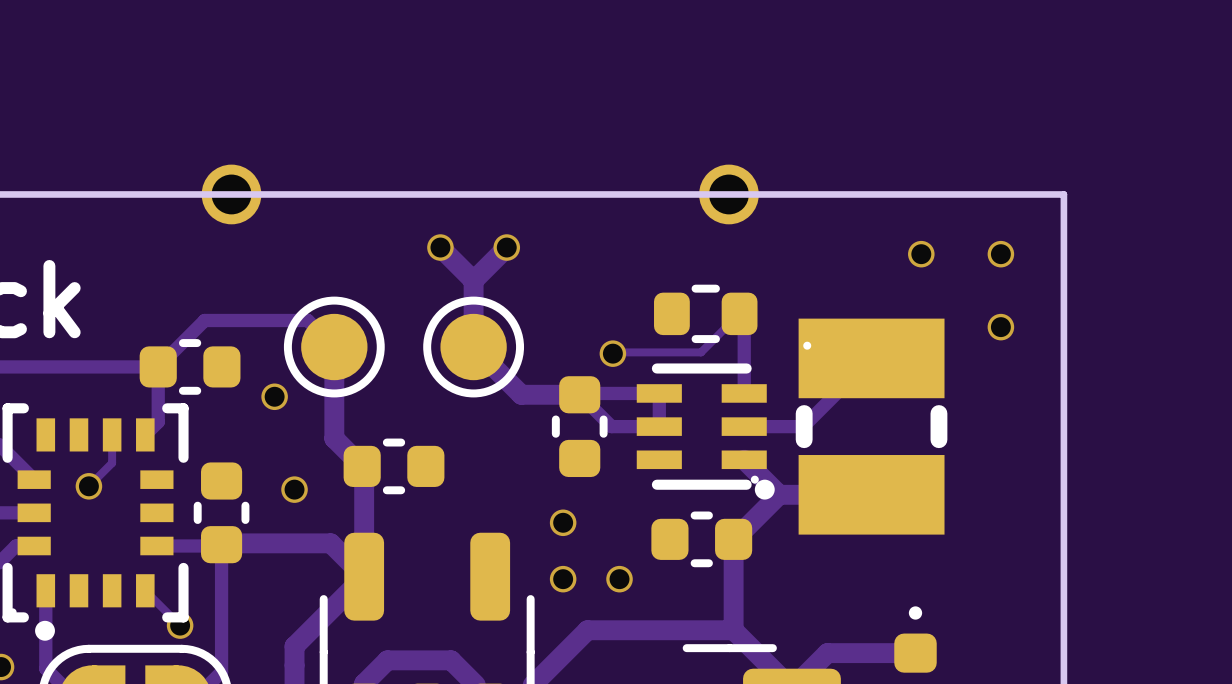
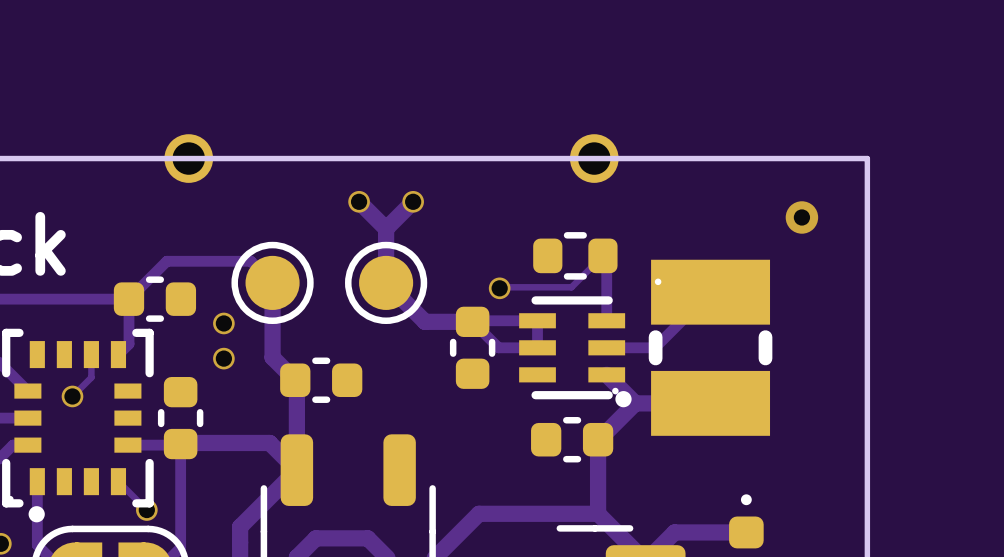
via size: [987, 240, 1015, 268] -> [785, 201, 819, 234]
via: (921, 254) -> none
via: (1000, 327) -> none
via position: (294, 489) -> (223, 358)
via: (563, 522) -> none
via: (563, 579) -> none
via: (619, 579) -> none

